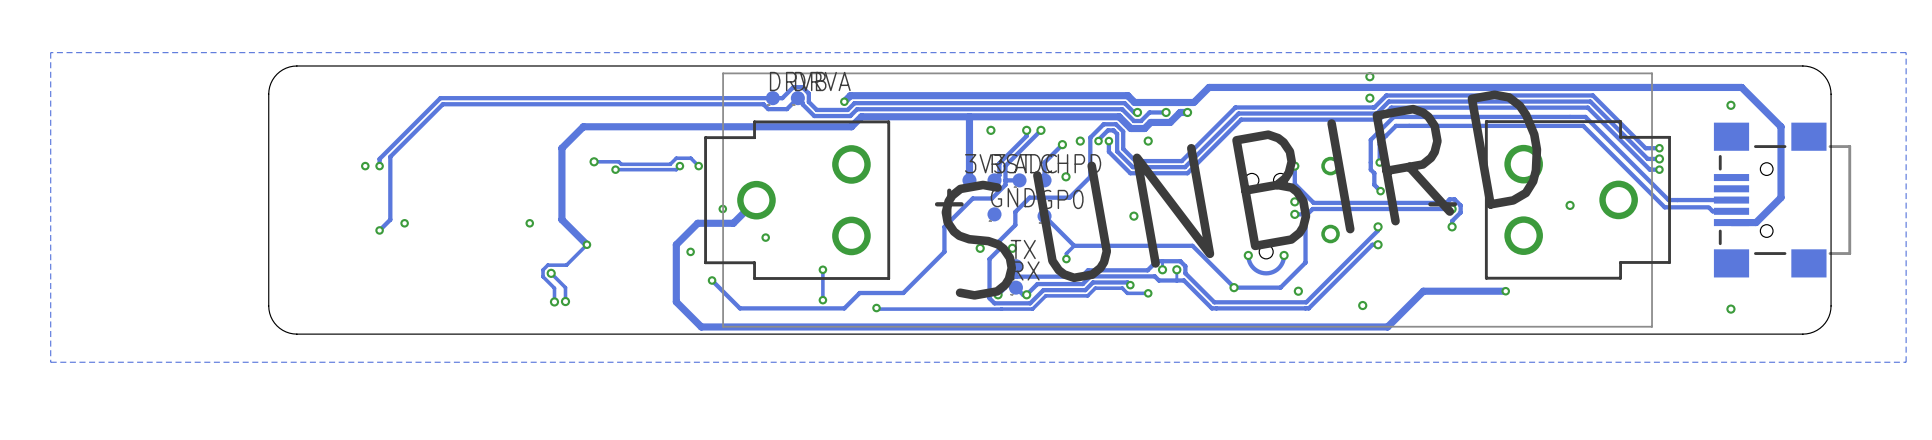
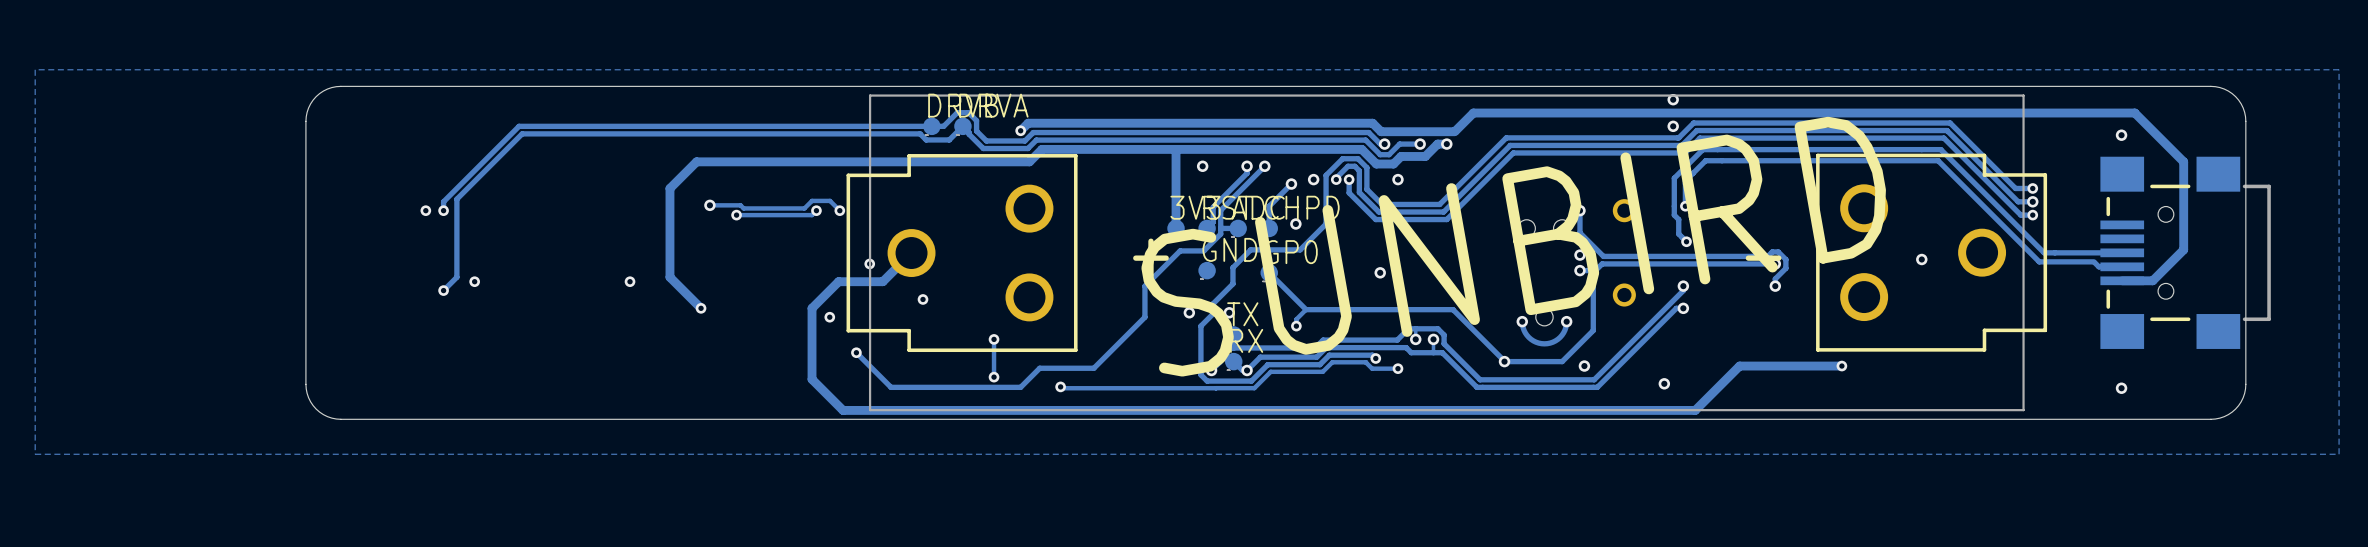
track: (586, 244) (566, 265) (547, 265) (543, 269) (543, 276) (554, 288) (554, 301) -> none
track: (551, 273) (565, 287) (565, 301) -> none
via: (551, 273) -> none
via: (554, 301) -> none
via: (565, 301) -> none

